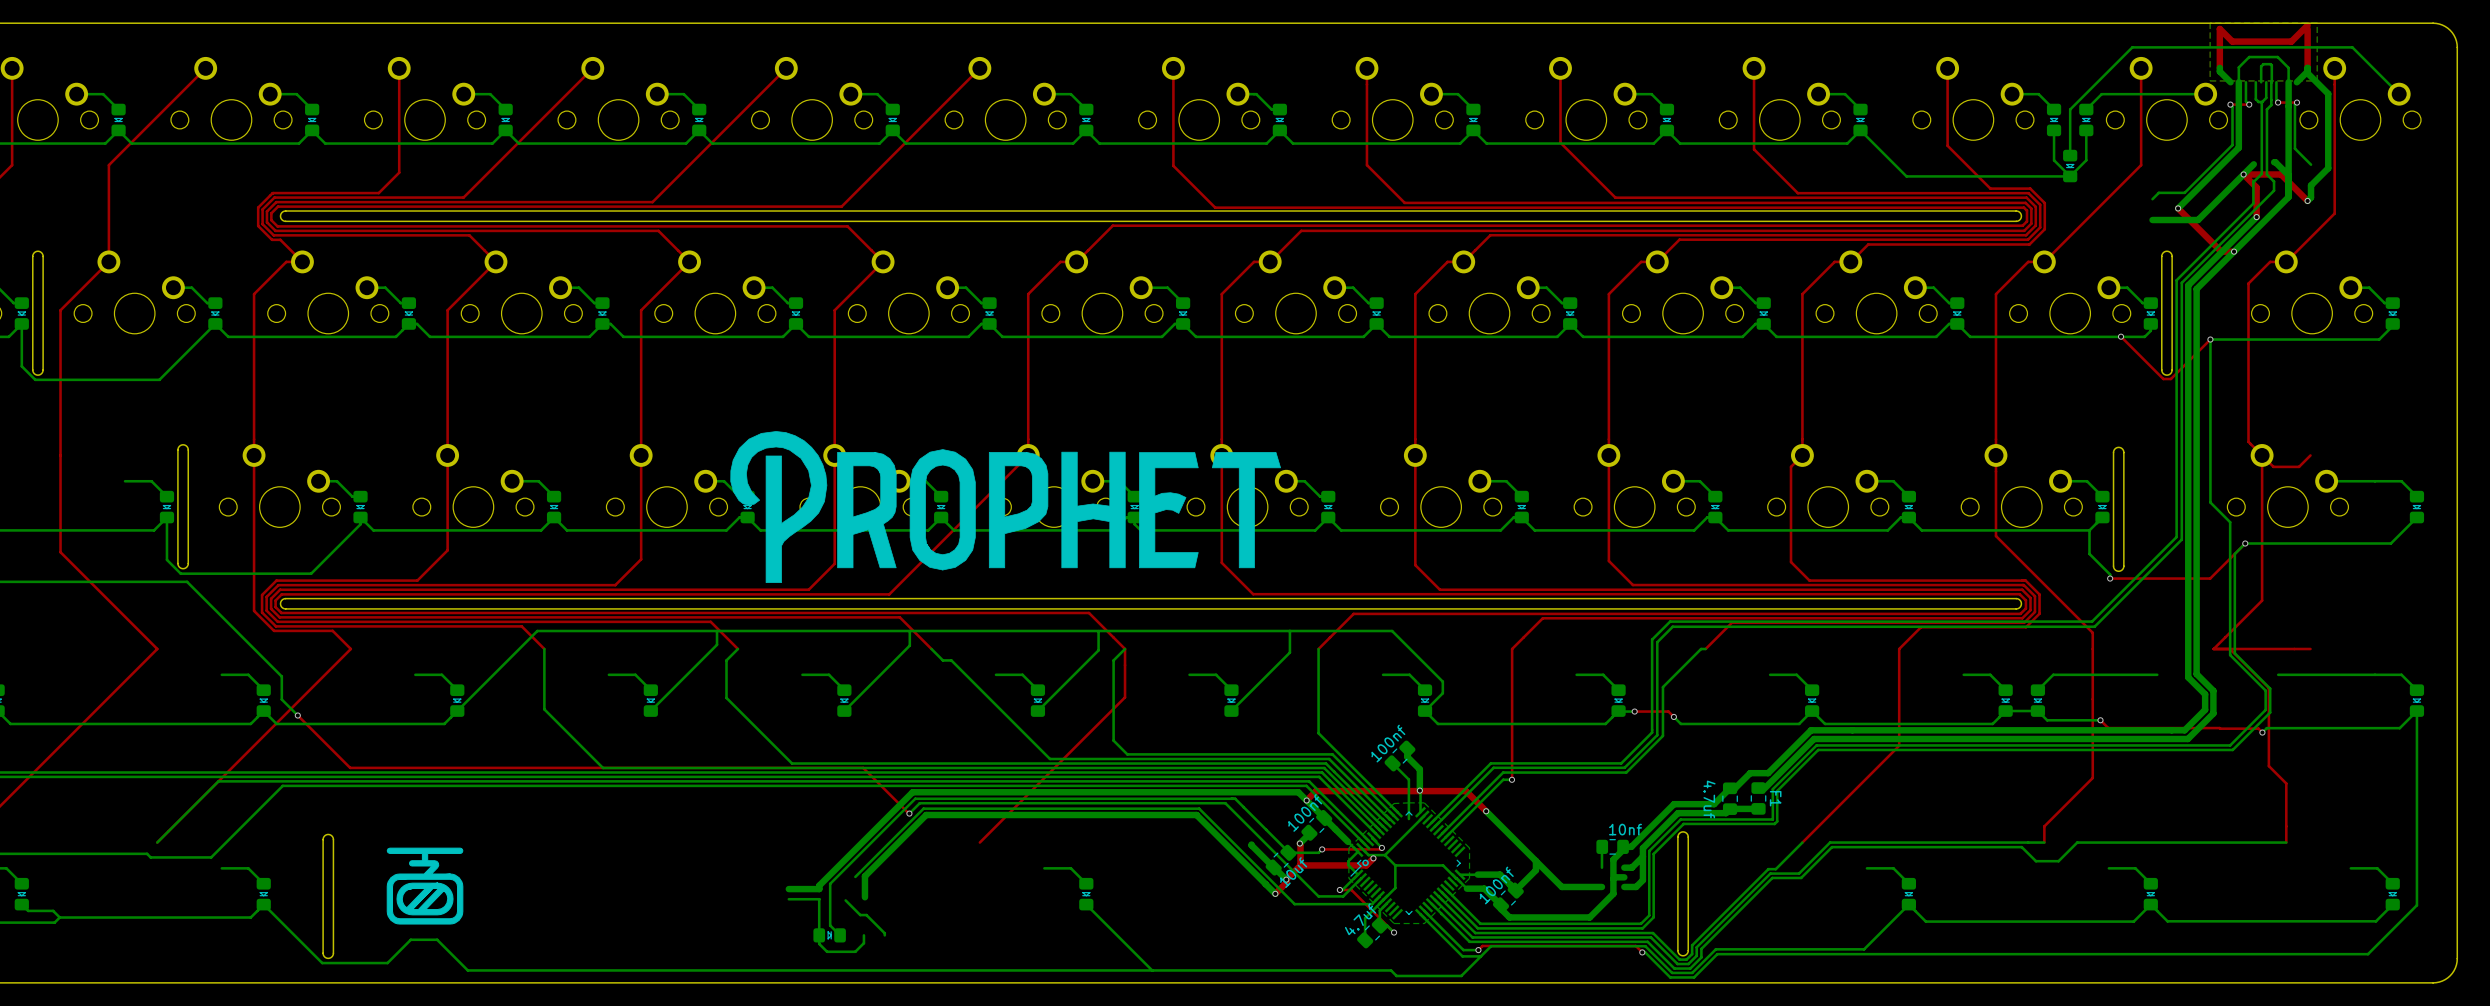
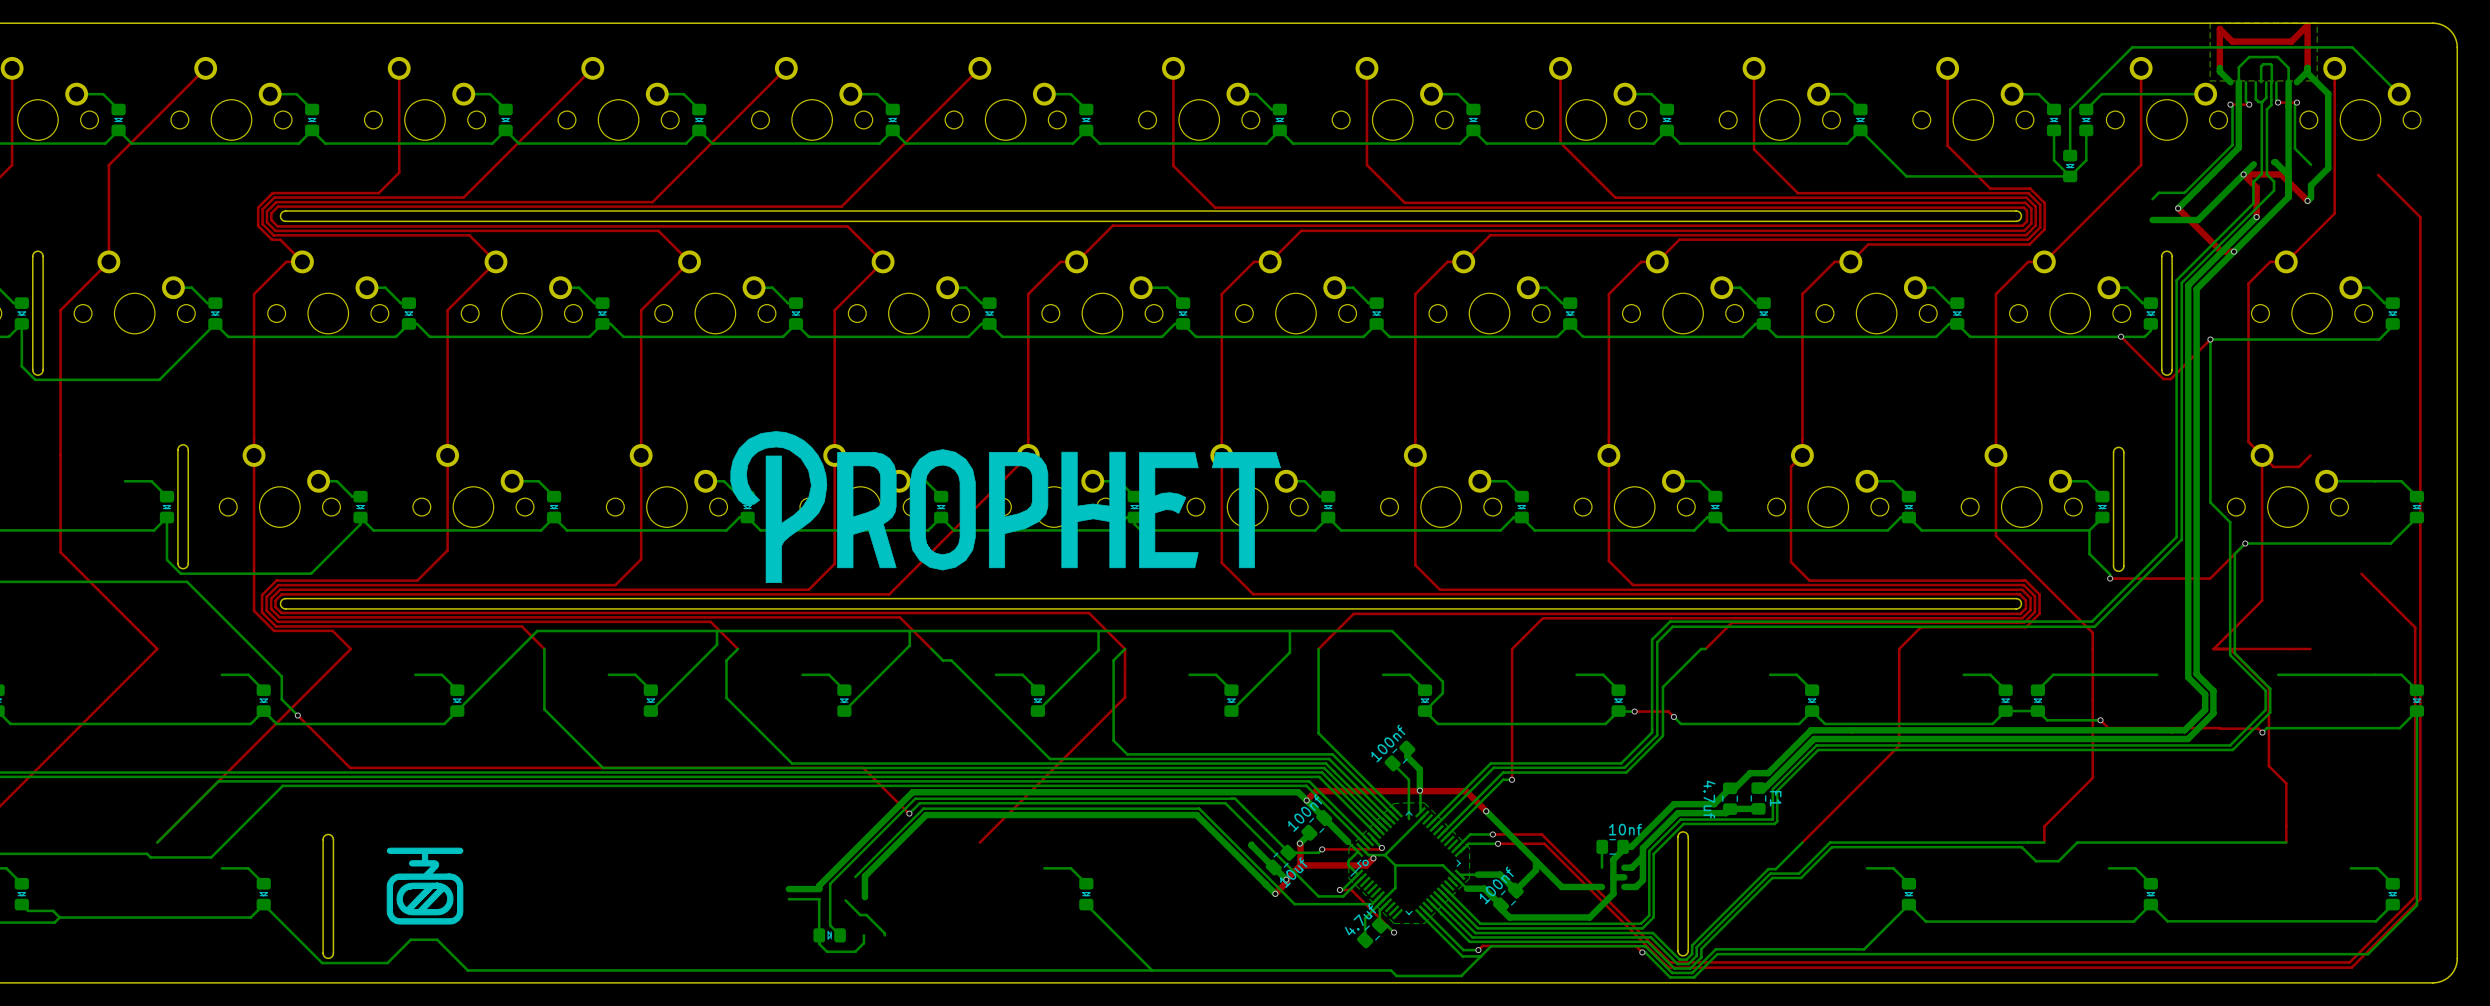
top track: none -> (2378, 174) (2420, 217) (2420, 899) (2351, 967) (1668, 967) (1544, 843) (1498, 843)
top track: none -> (2361, 573) (2415, 627) (2415, 896) (2349, 962) (1669, 962) (1541, 834) (1492, 834)
bottom track: none -> (1492, 834) (1470, 834) (1456, 848)
via: none -> (1492, 834)
bottom track: none -> (1498, 843) (1468, 843) (1460, 851)
via: none -> (1498, 843)

